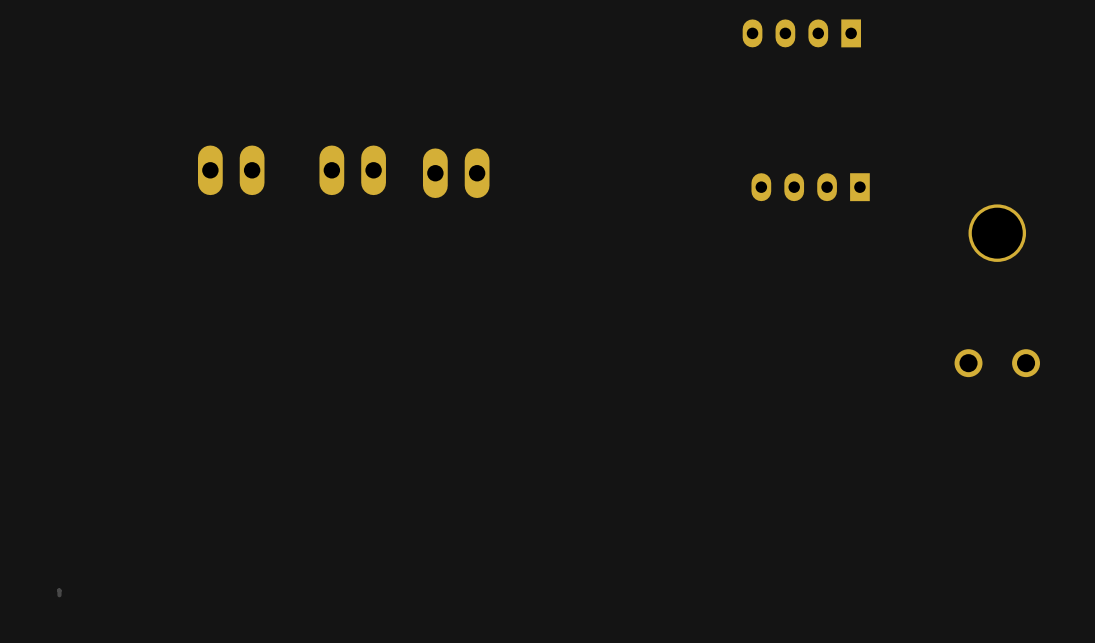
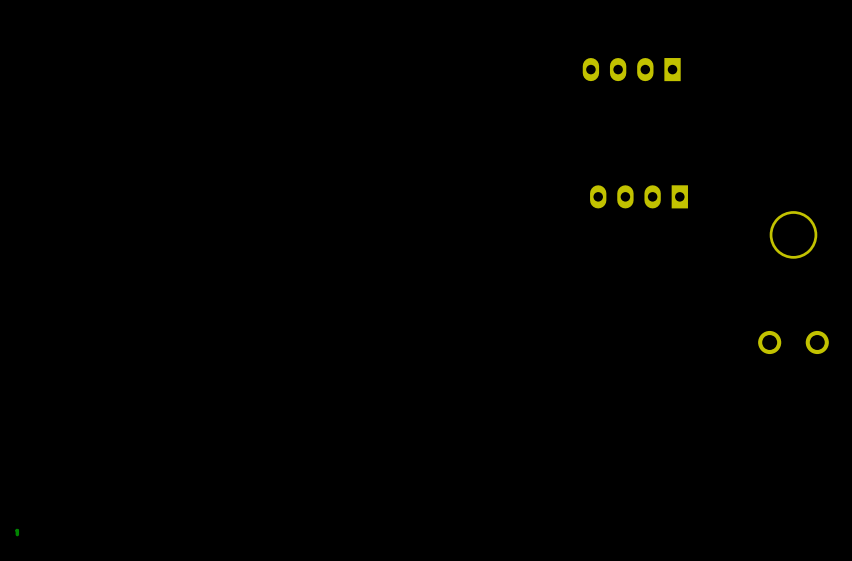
part: (231, 170) -> none
part: (352, 170) -> none
part: (456, 173) -> none

